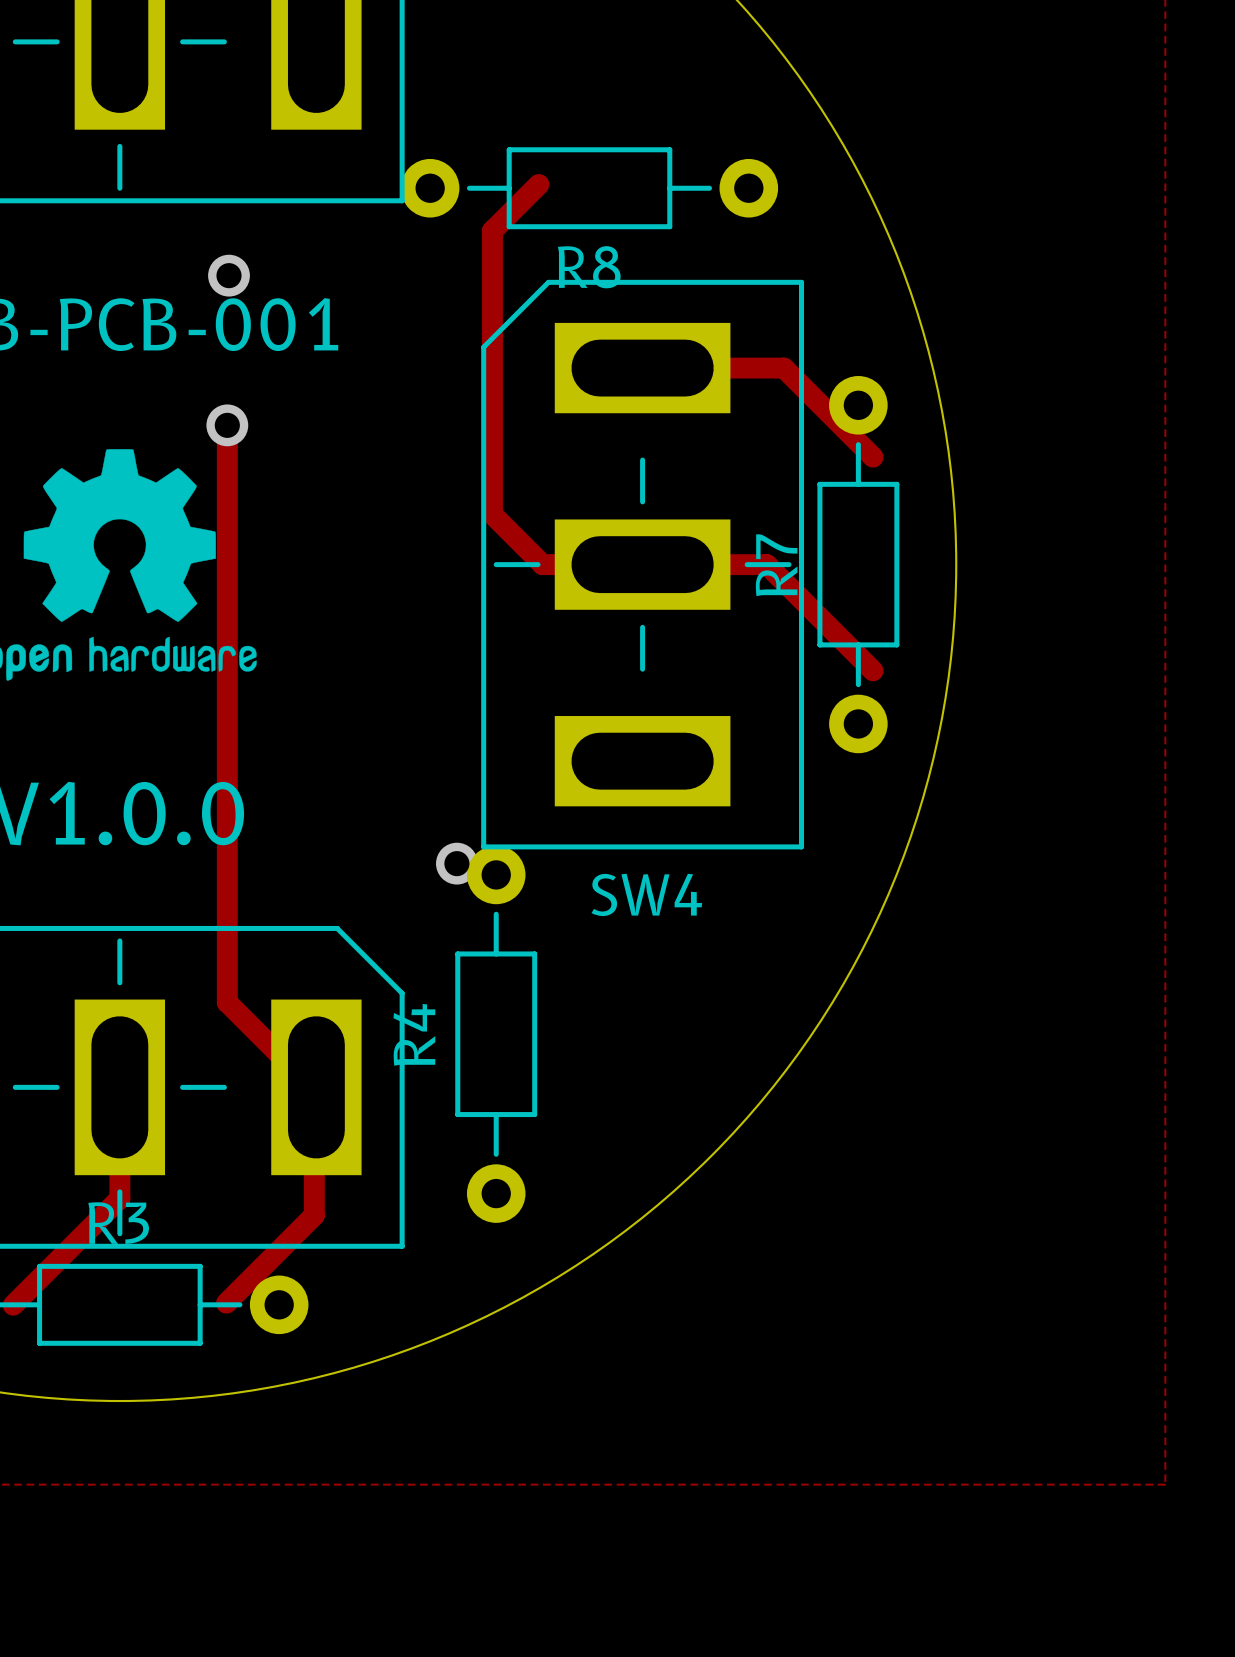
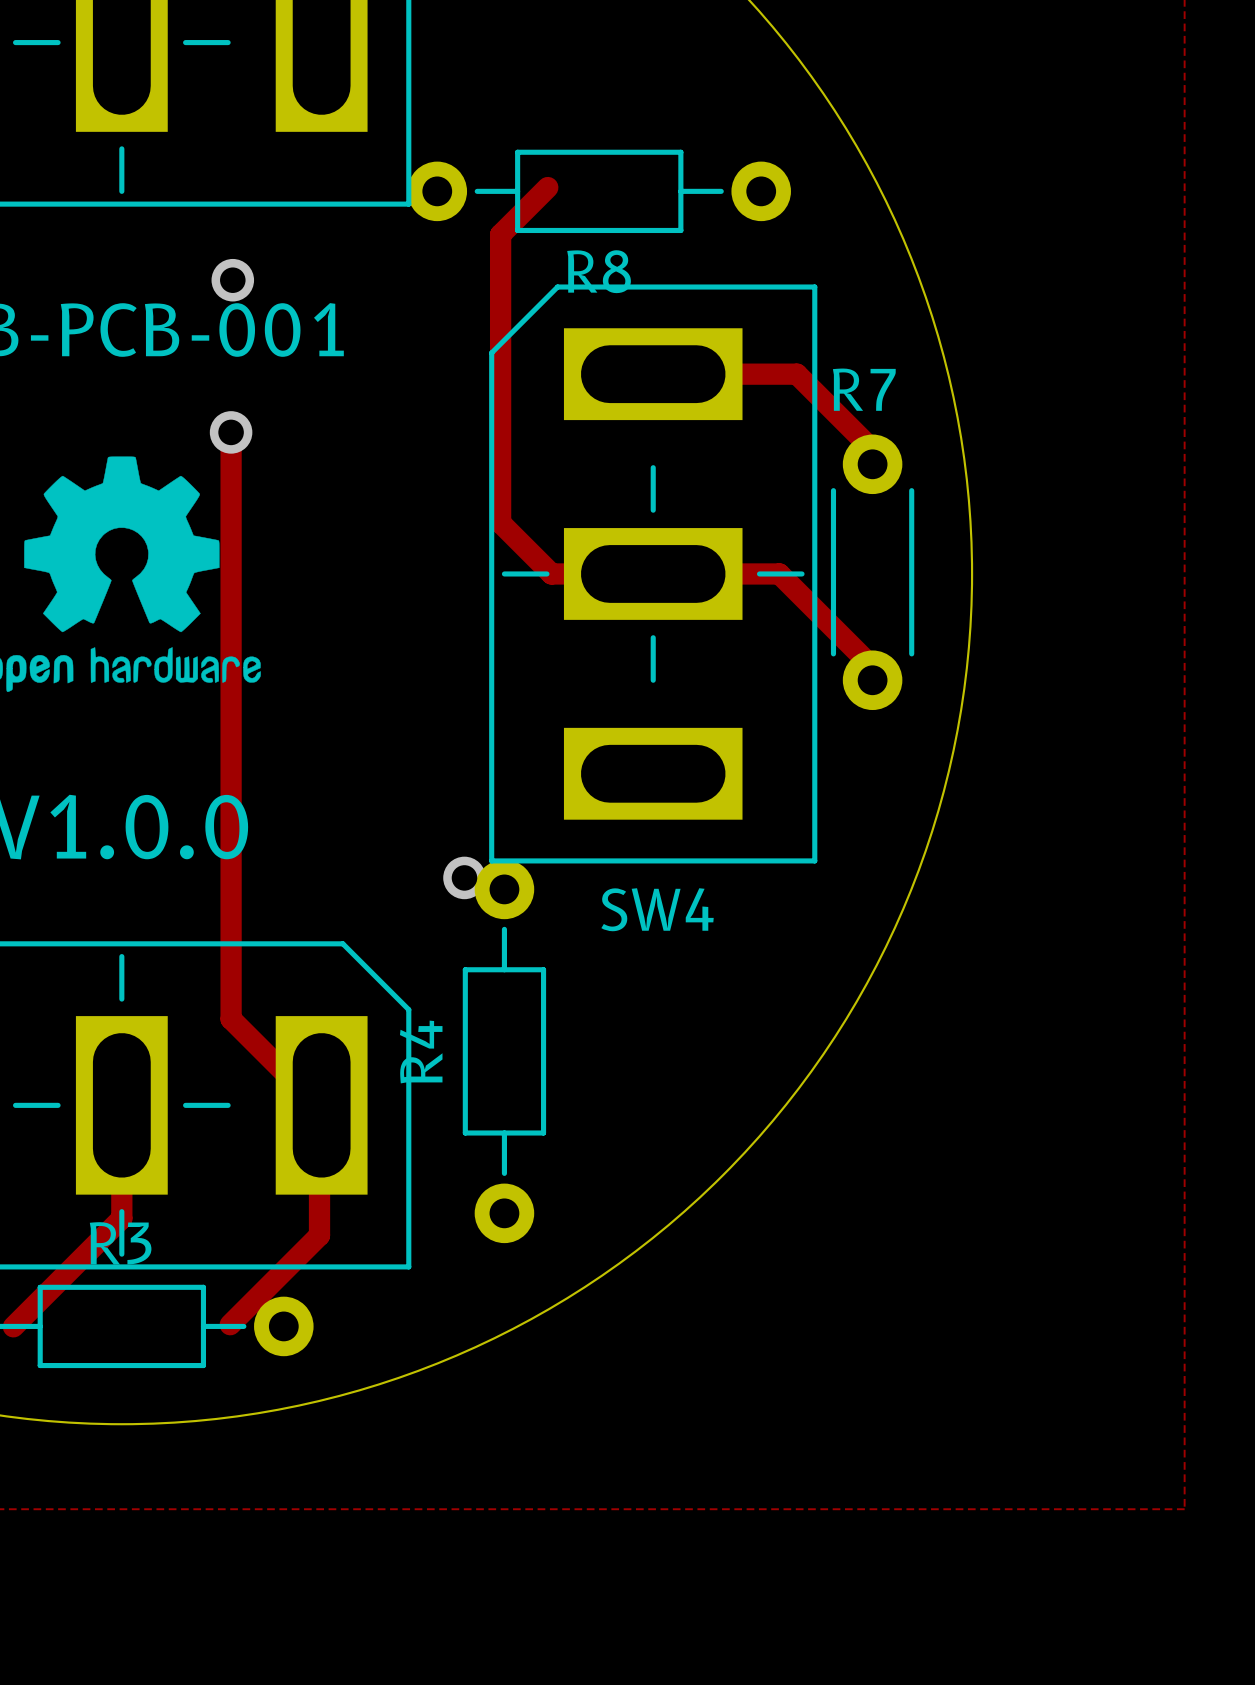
R7 footprint: [817, 376, 900, 754] -> [830, 434, 915, 711]
R7 name position: R7 (776, 565) -> R7 (864, 389)

